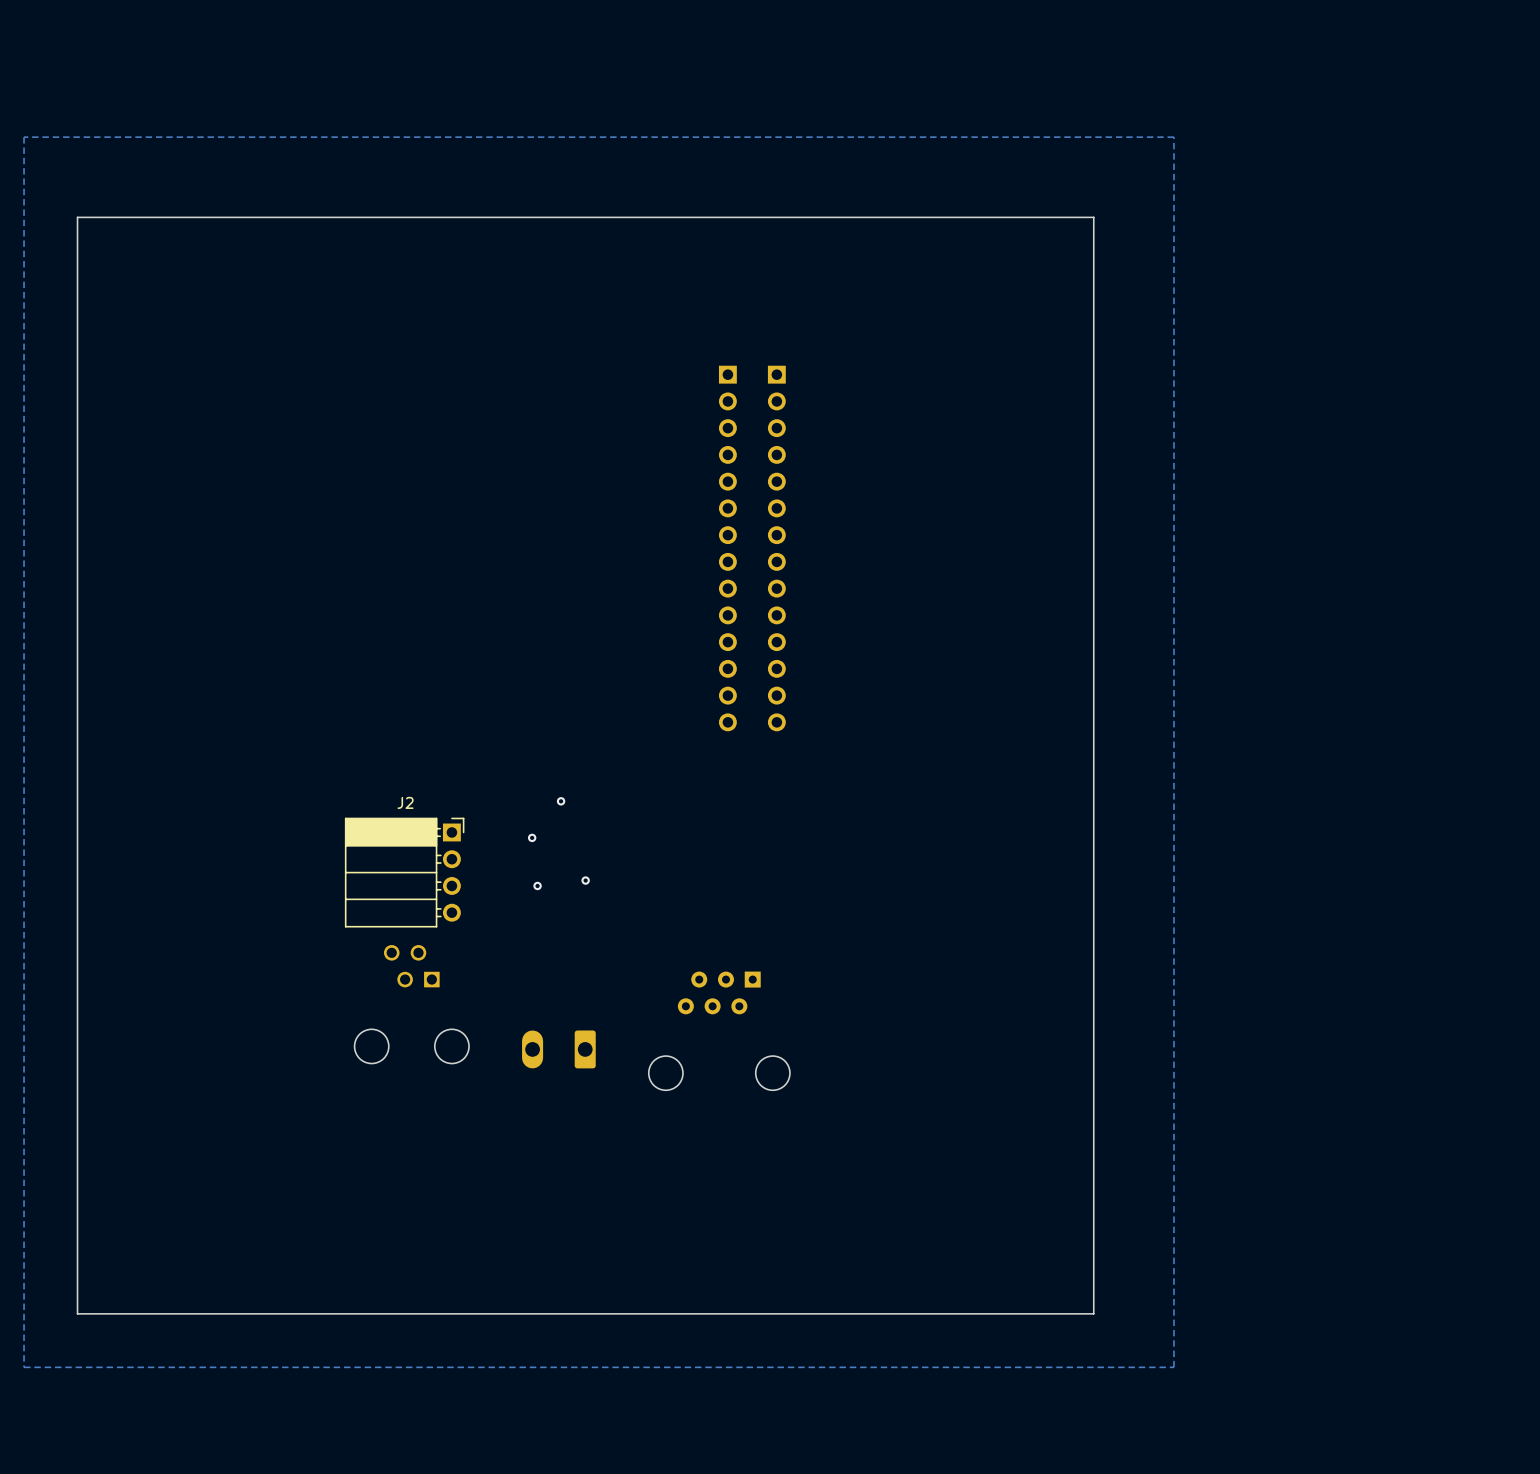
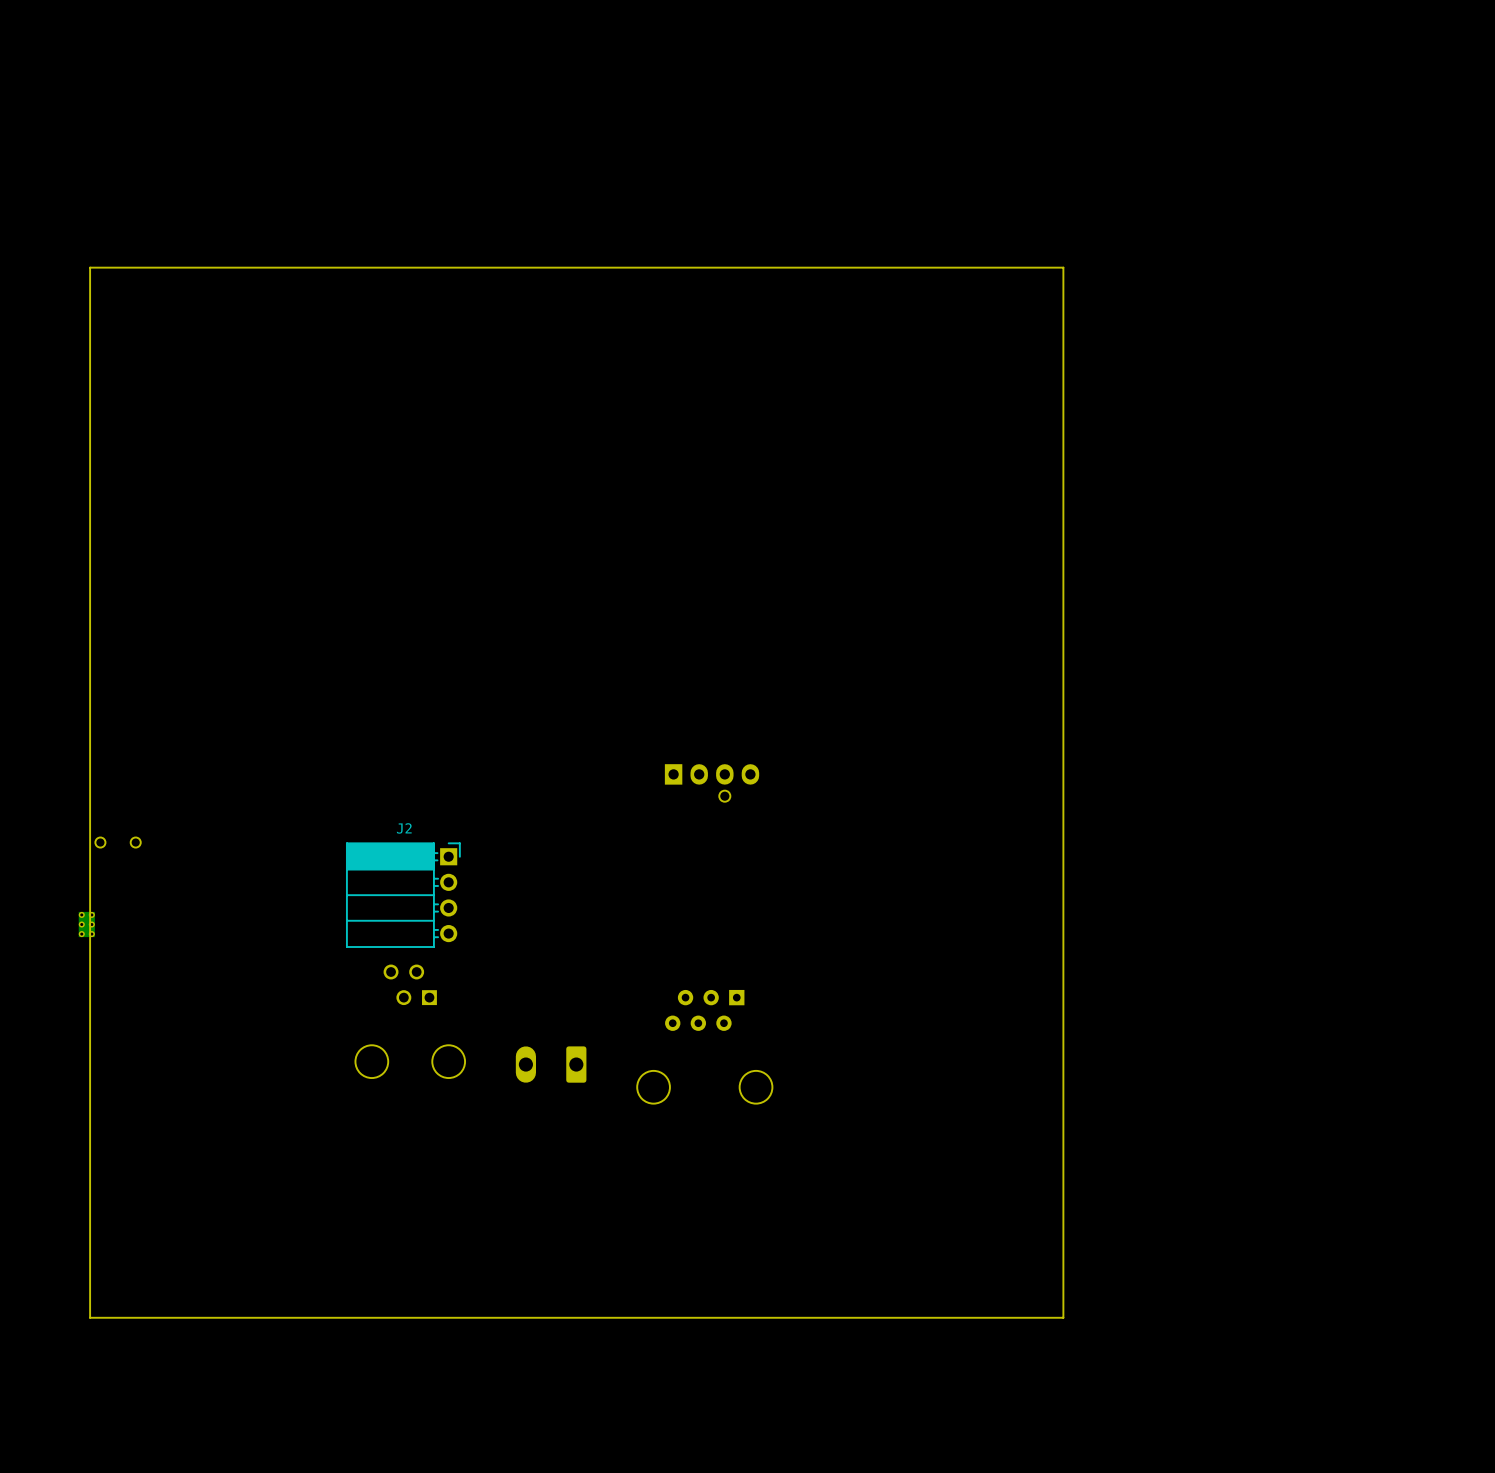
zone outline: (1173, 137) (24, 137) (24, 1367) (1173, 1367) (1173, 137) -> none
part: (727, 548) -> none
part: (776, 548) -> none
part: none -> (712, 782)
via: (561, 801) -> none
part: none -> (118, 842)
via: (532, 837) -> none
via: (585, 880) -> none
via: (537, 885) -> none
part: none -> (86, 924)

